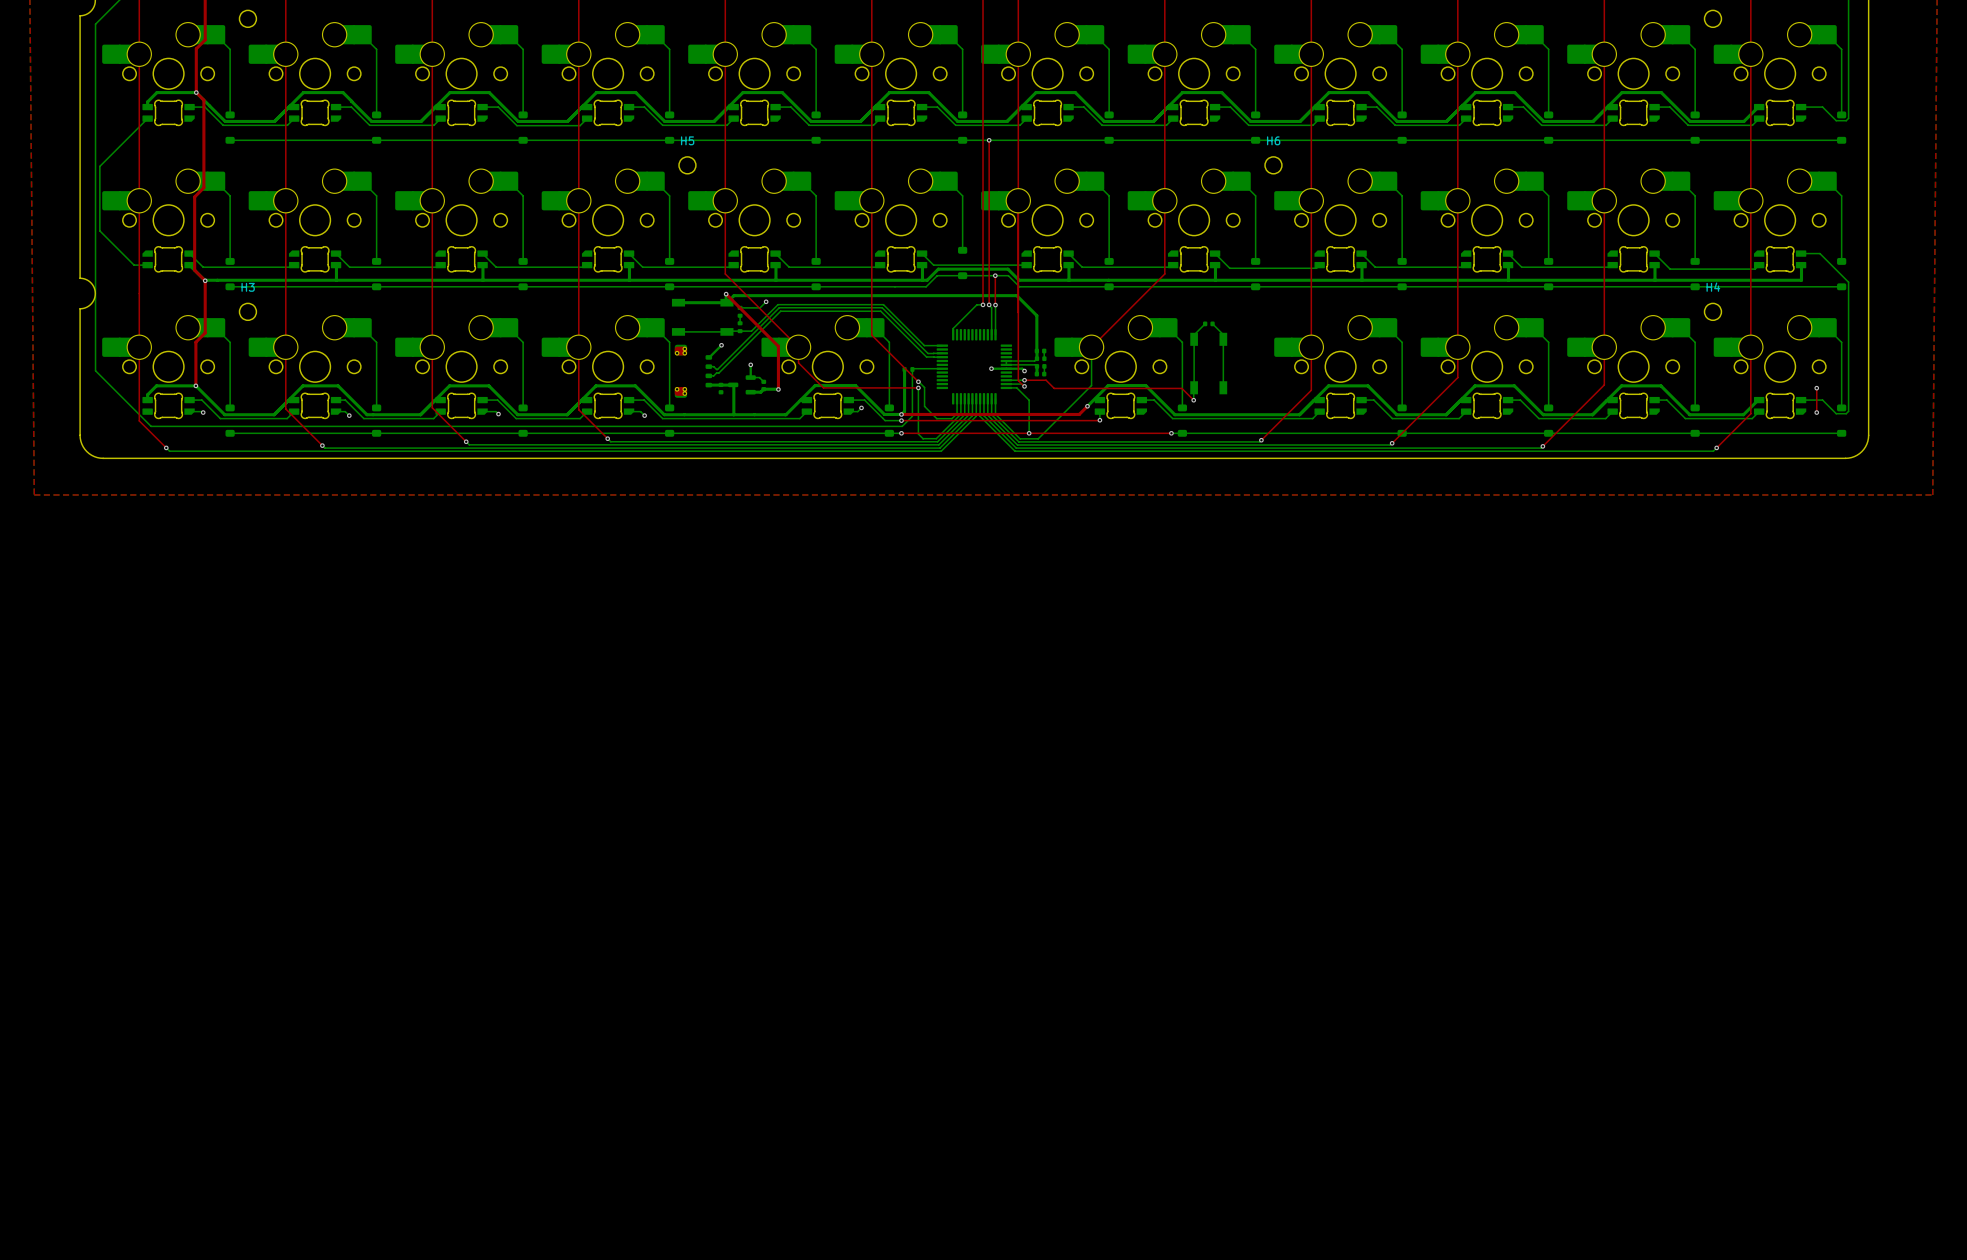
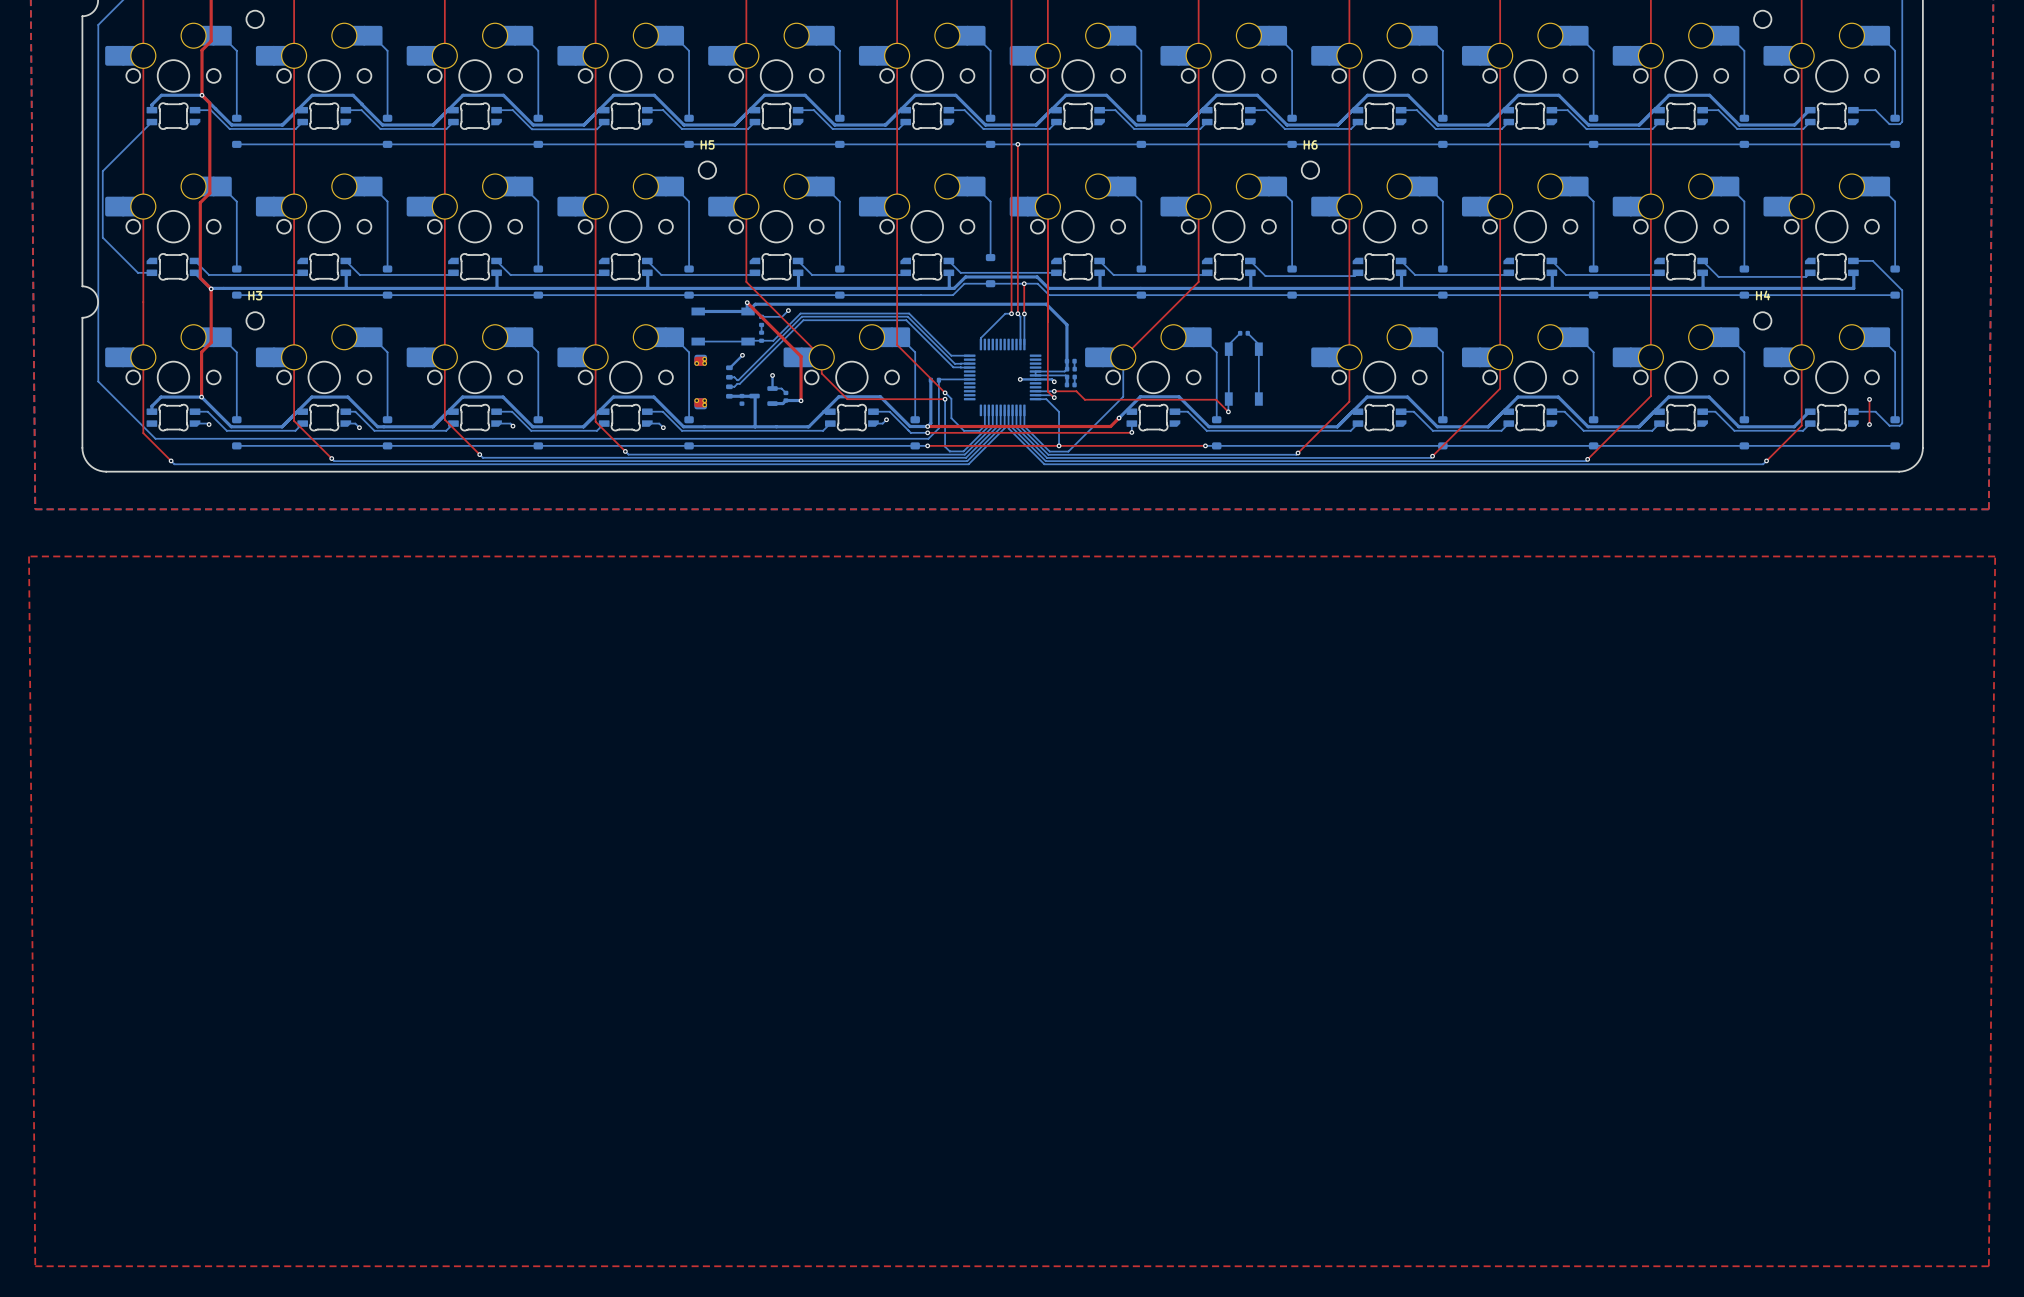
top zone outline: none -> (29, 556) (1995, 556) (1988, 1266) (35, 1266) (29, 556)

